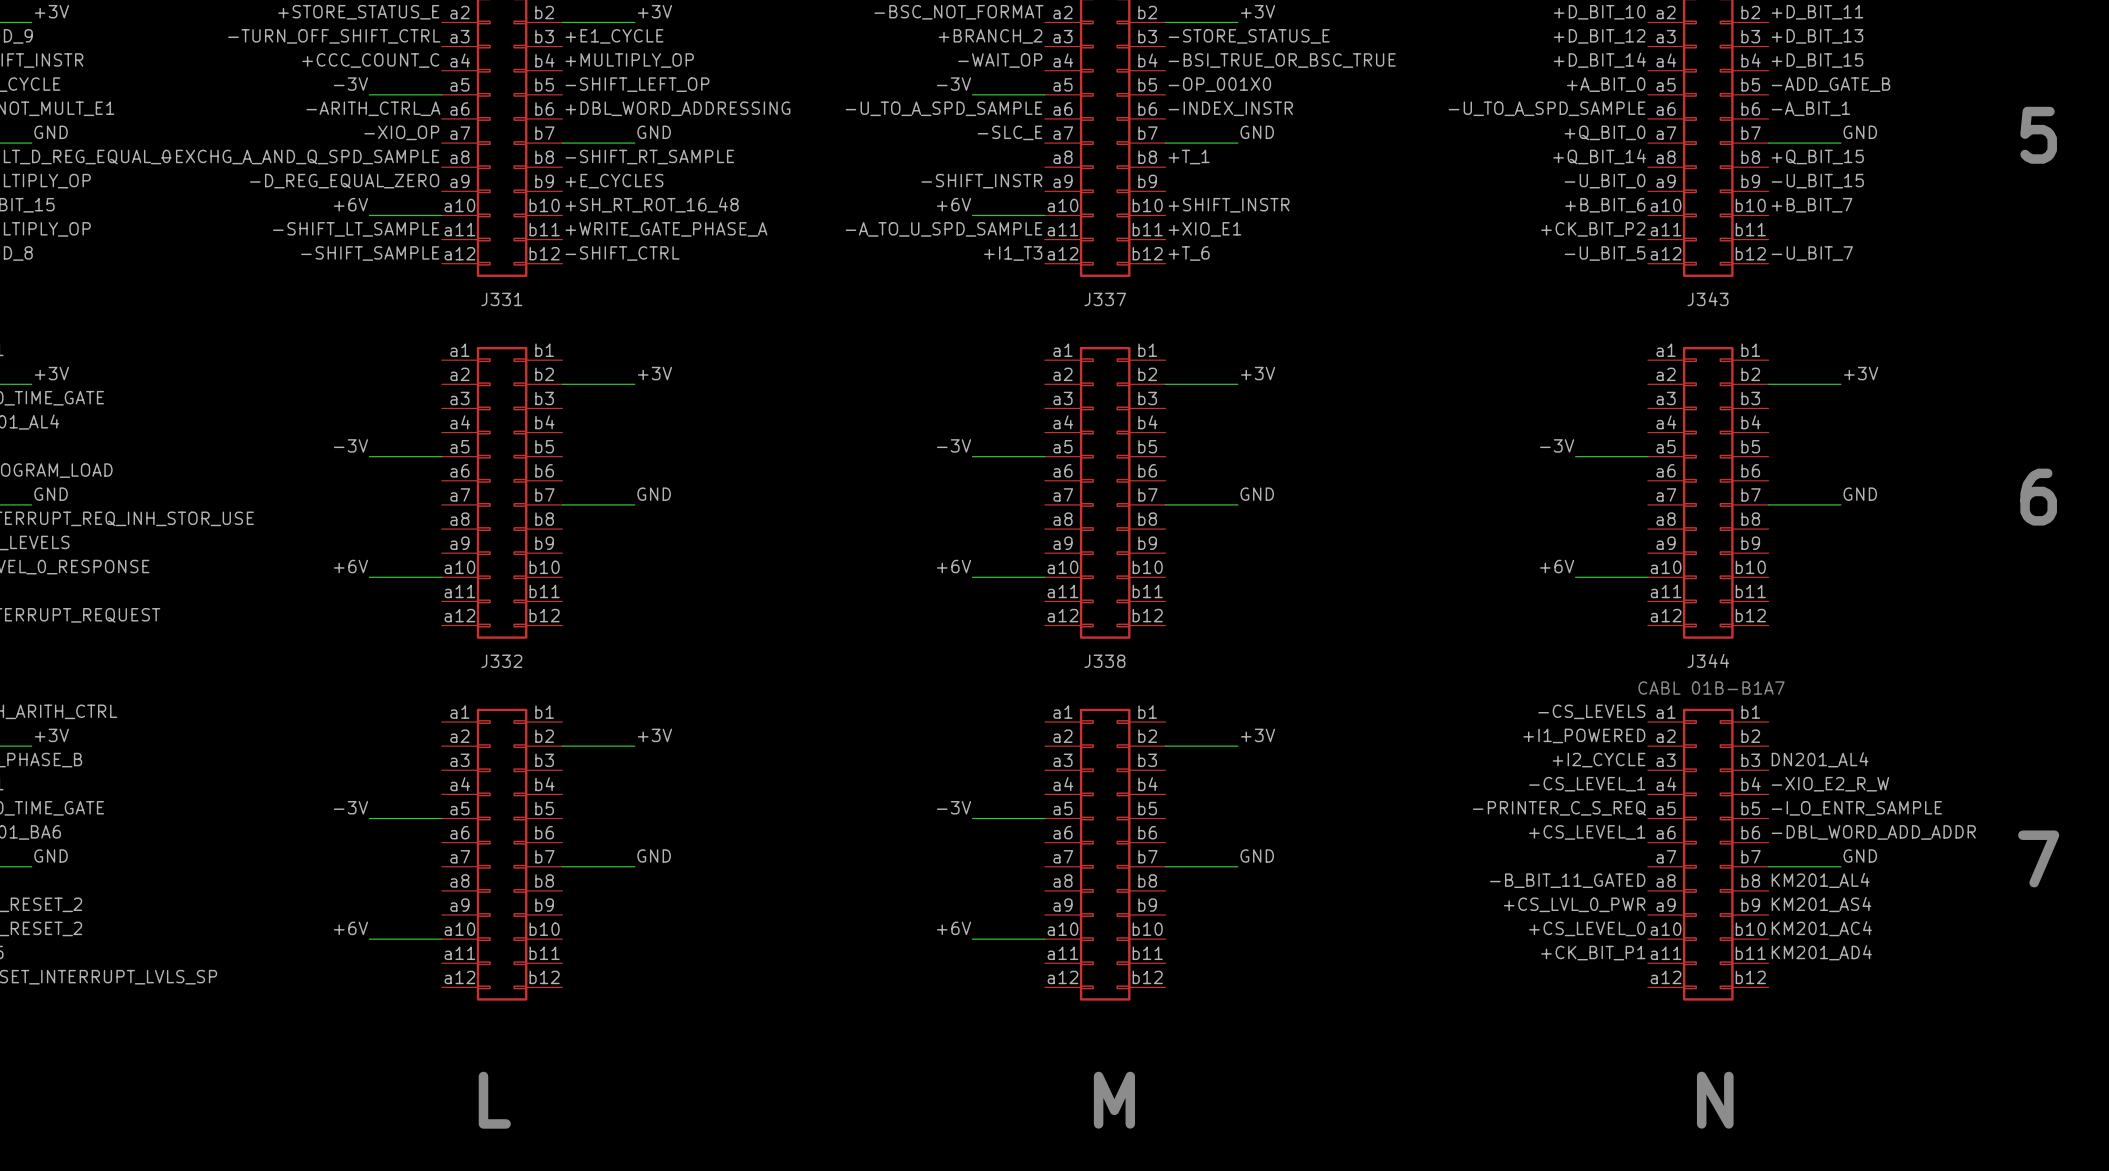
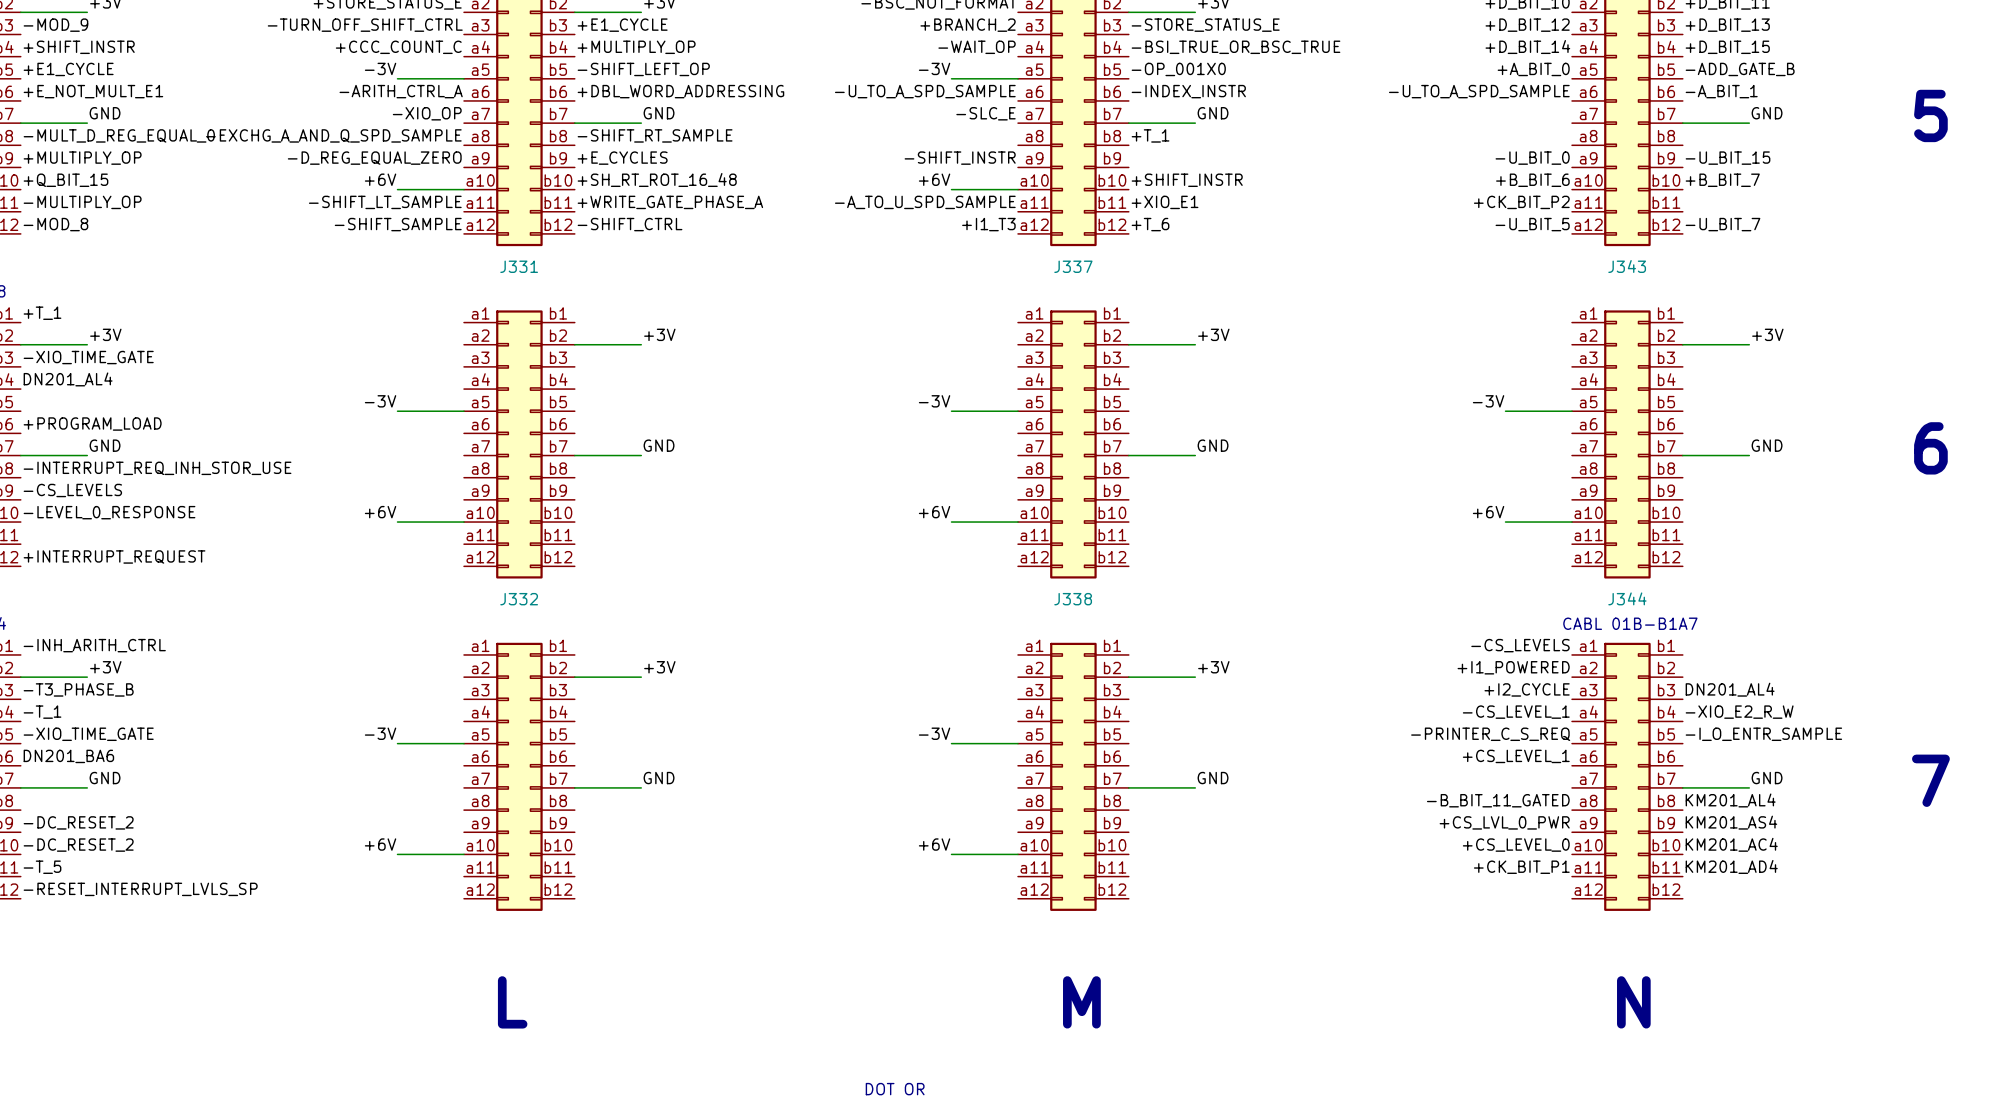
label: +Q_BIT_0 (1605, 132) -> none
label: +Q_BIT_14 (1599, 156) -> none
label: +Q_BIT_15 (1817, 157) -> none
label: -DBL_WORD_ADD_ADDR (1873, 832) -> none

